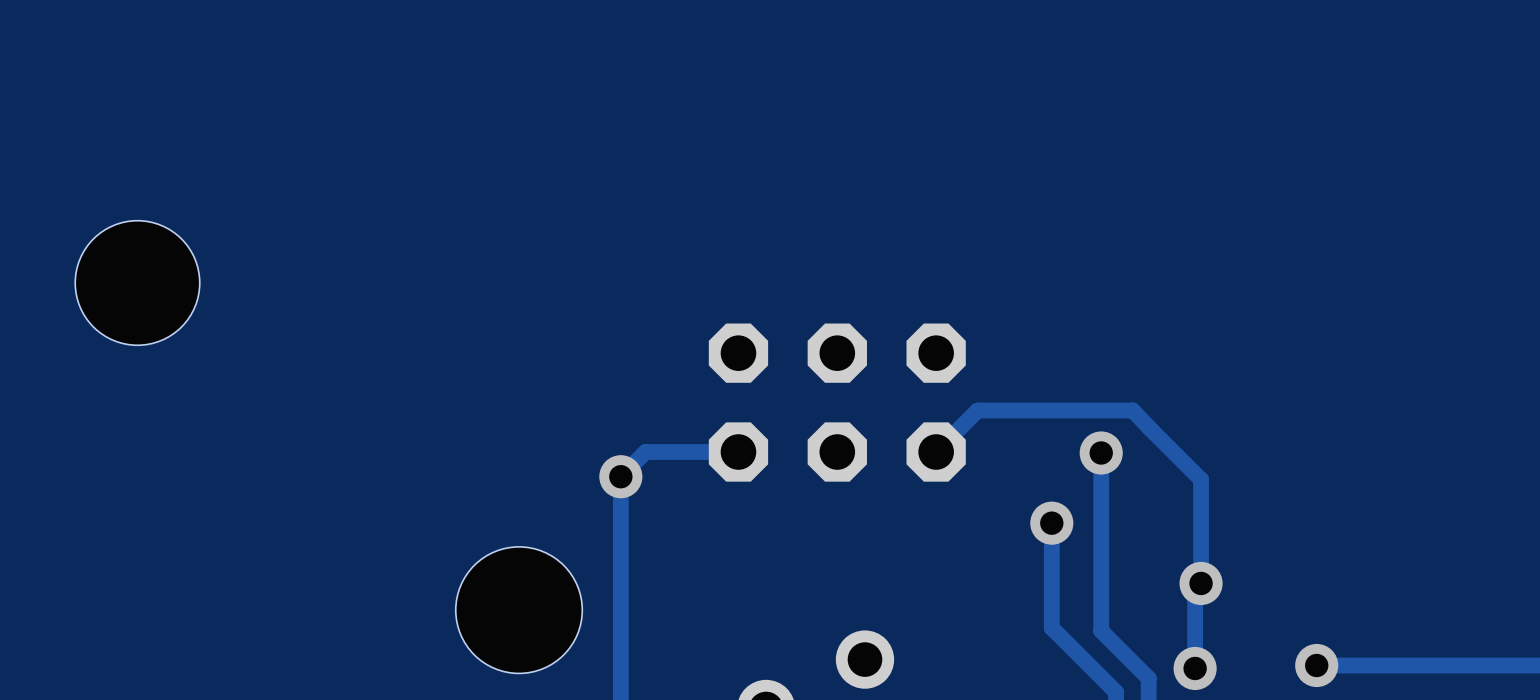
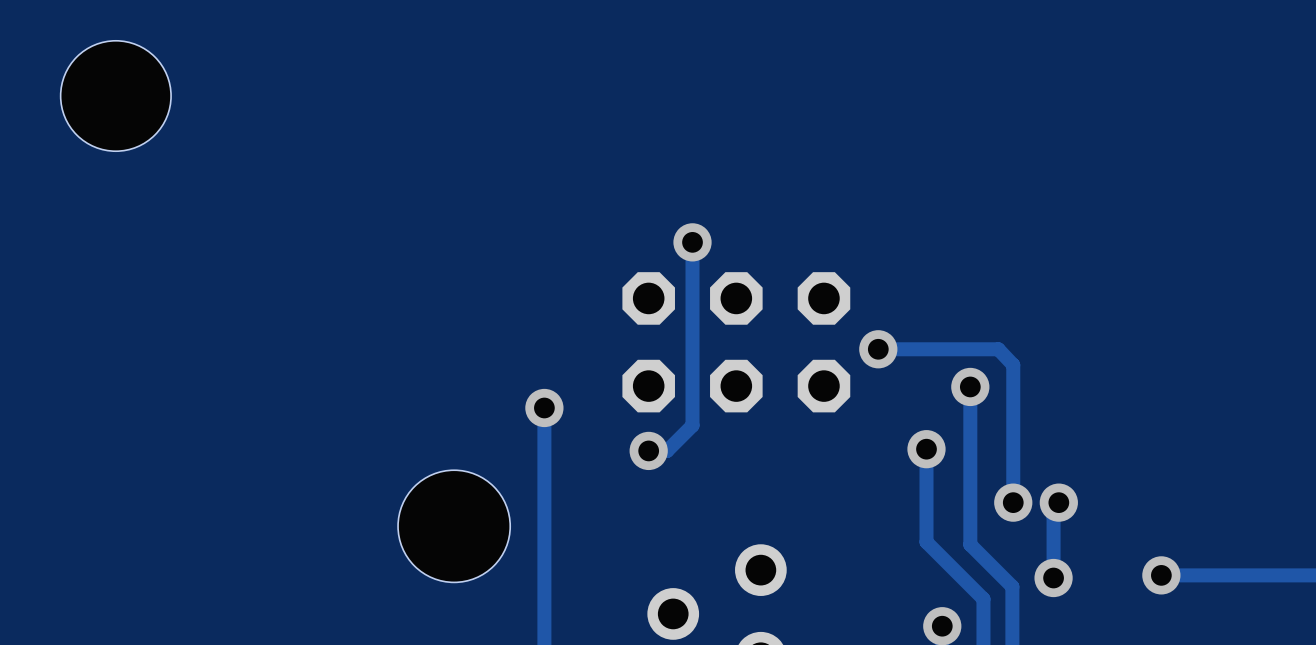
hole position: (137, 282) -> (115, 96)
track: none -> (692, 242) (692, 425) (667, 450) (648, 450)
via: none -> (692, 242)
track: (997, 410) (977, 410) (936, 452) -> none
via: none -> (878, 349)
track: (1149, 428) (1201, 479) (1201, 583) -> (1013, 365) (1013, 502)
track: (738, 452) (645, 452) (620, 476) -> none
via: none -> (648, 450)
via: none -> (1013, 502)

